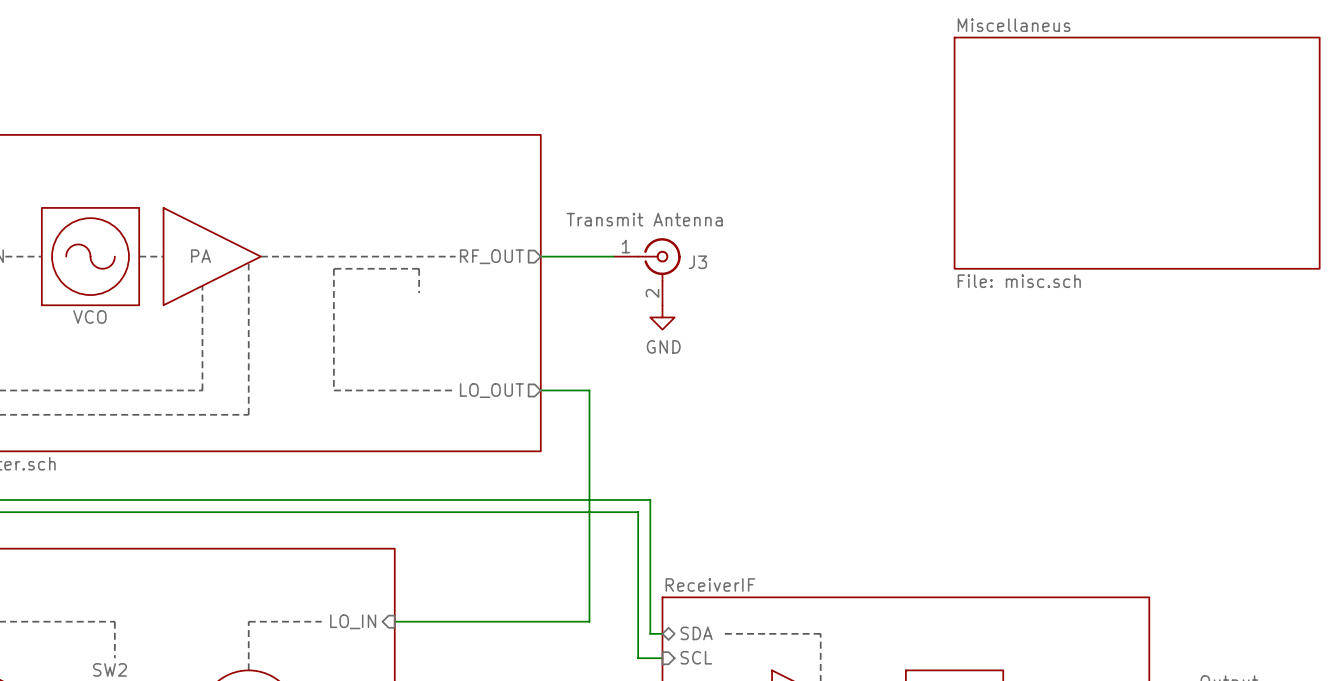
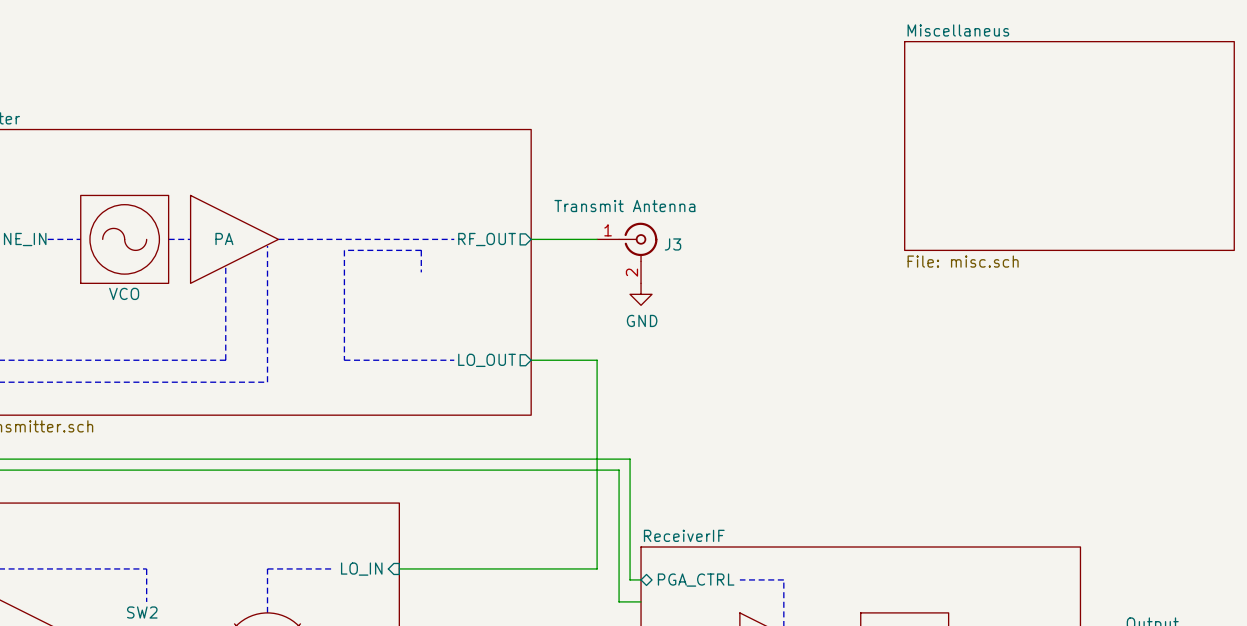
wire: (589, 390) (589, 621) -> (575, 360) (597, 360) (597, 568) (575, 568)
sheet pin: SDA (696, 633) -> PGA_CTRL (696, 580)
line: (723, 633) (772, 633) -> none
sheet pin: SCL (696, 657) -> none

